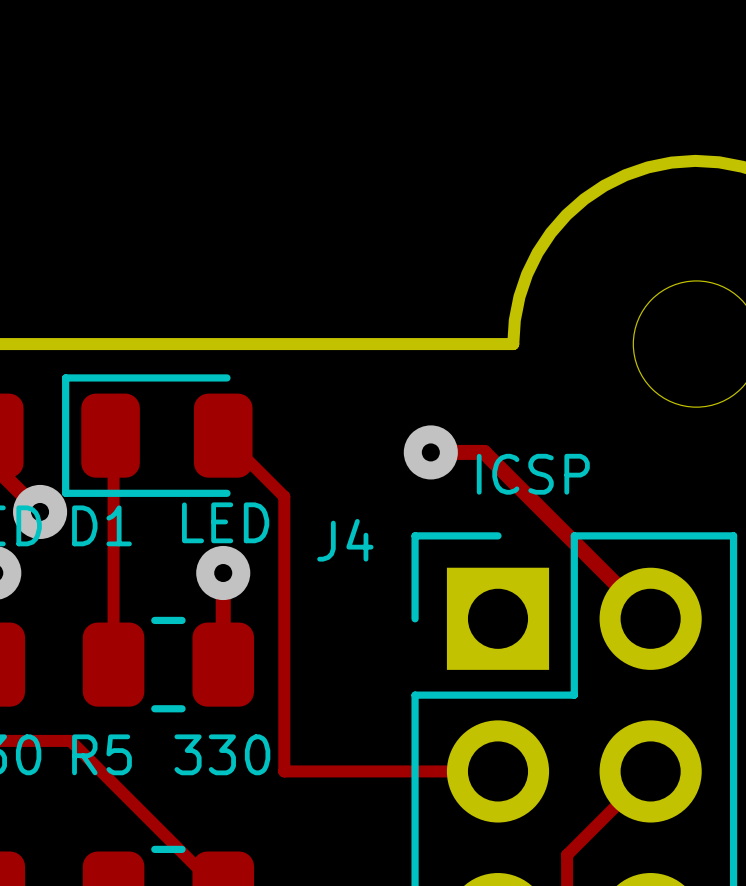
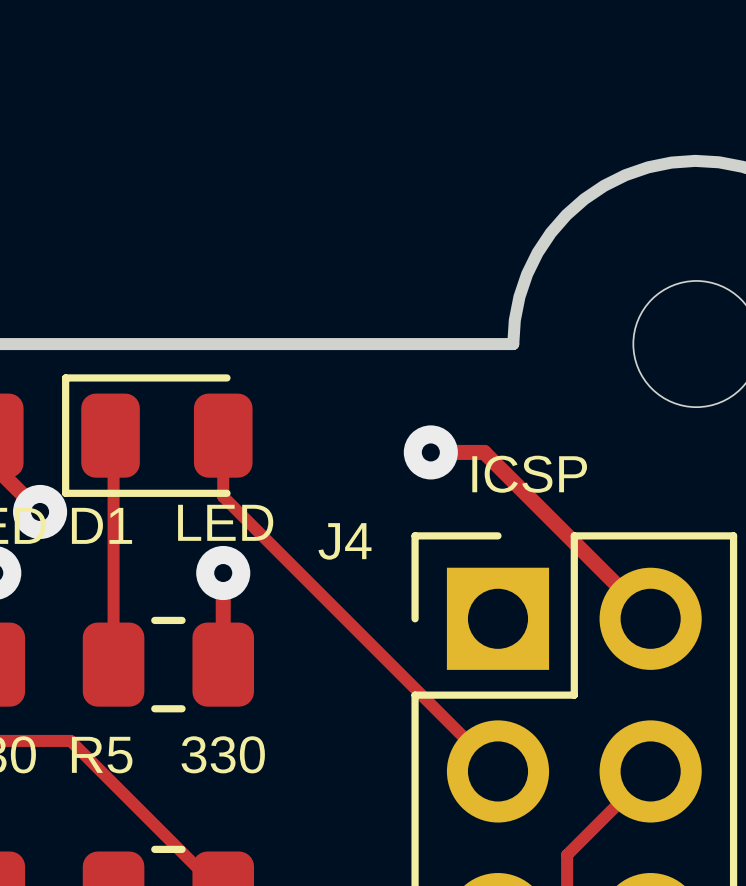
track: (223, 435) (284, 496) (284, 771) (497, 771) -> (223, 435) (223, 496) (497, 771)

